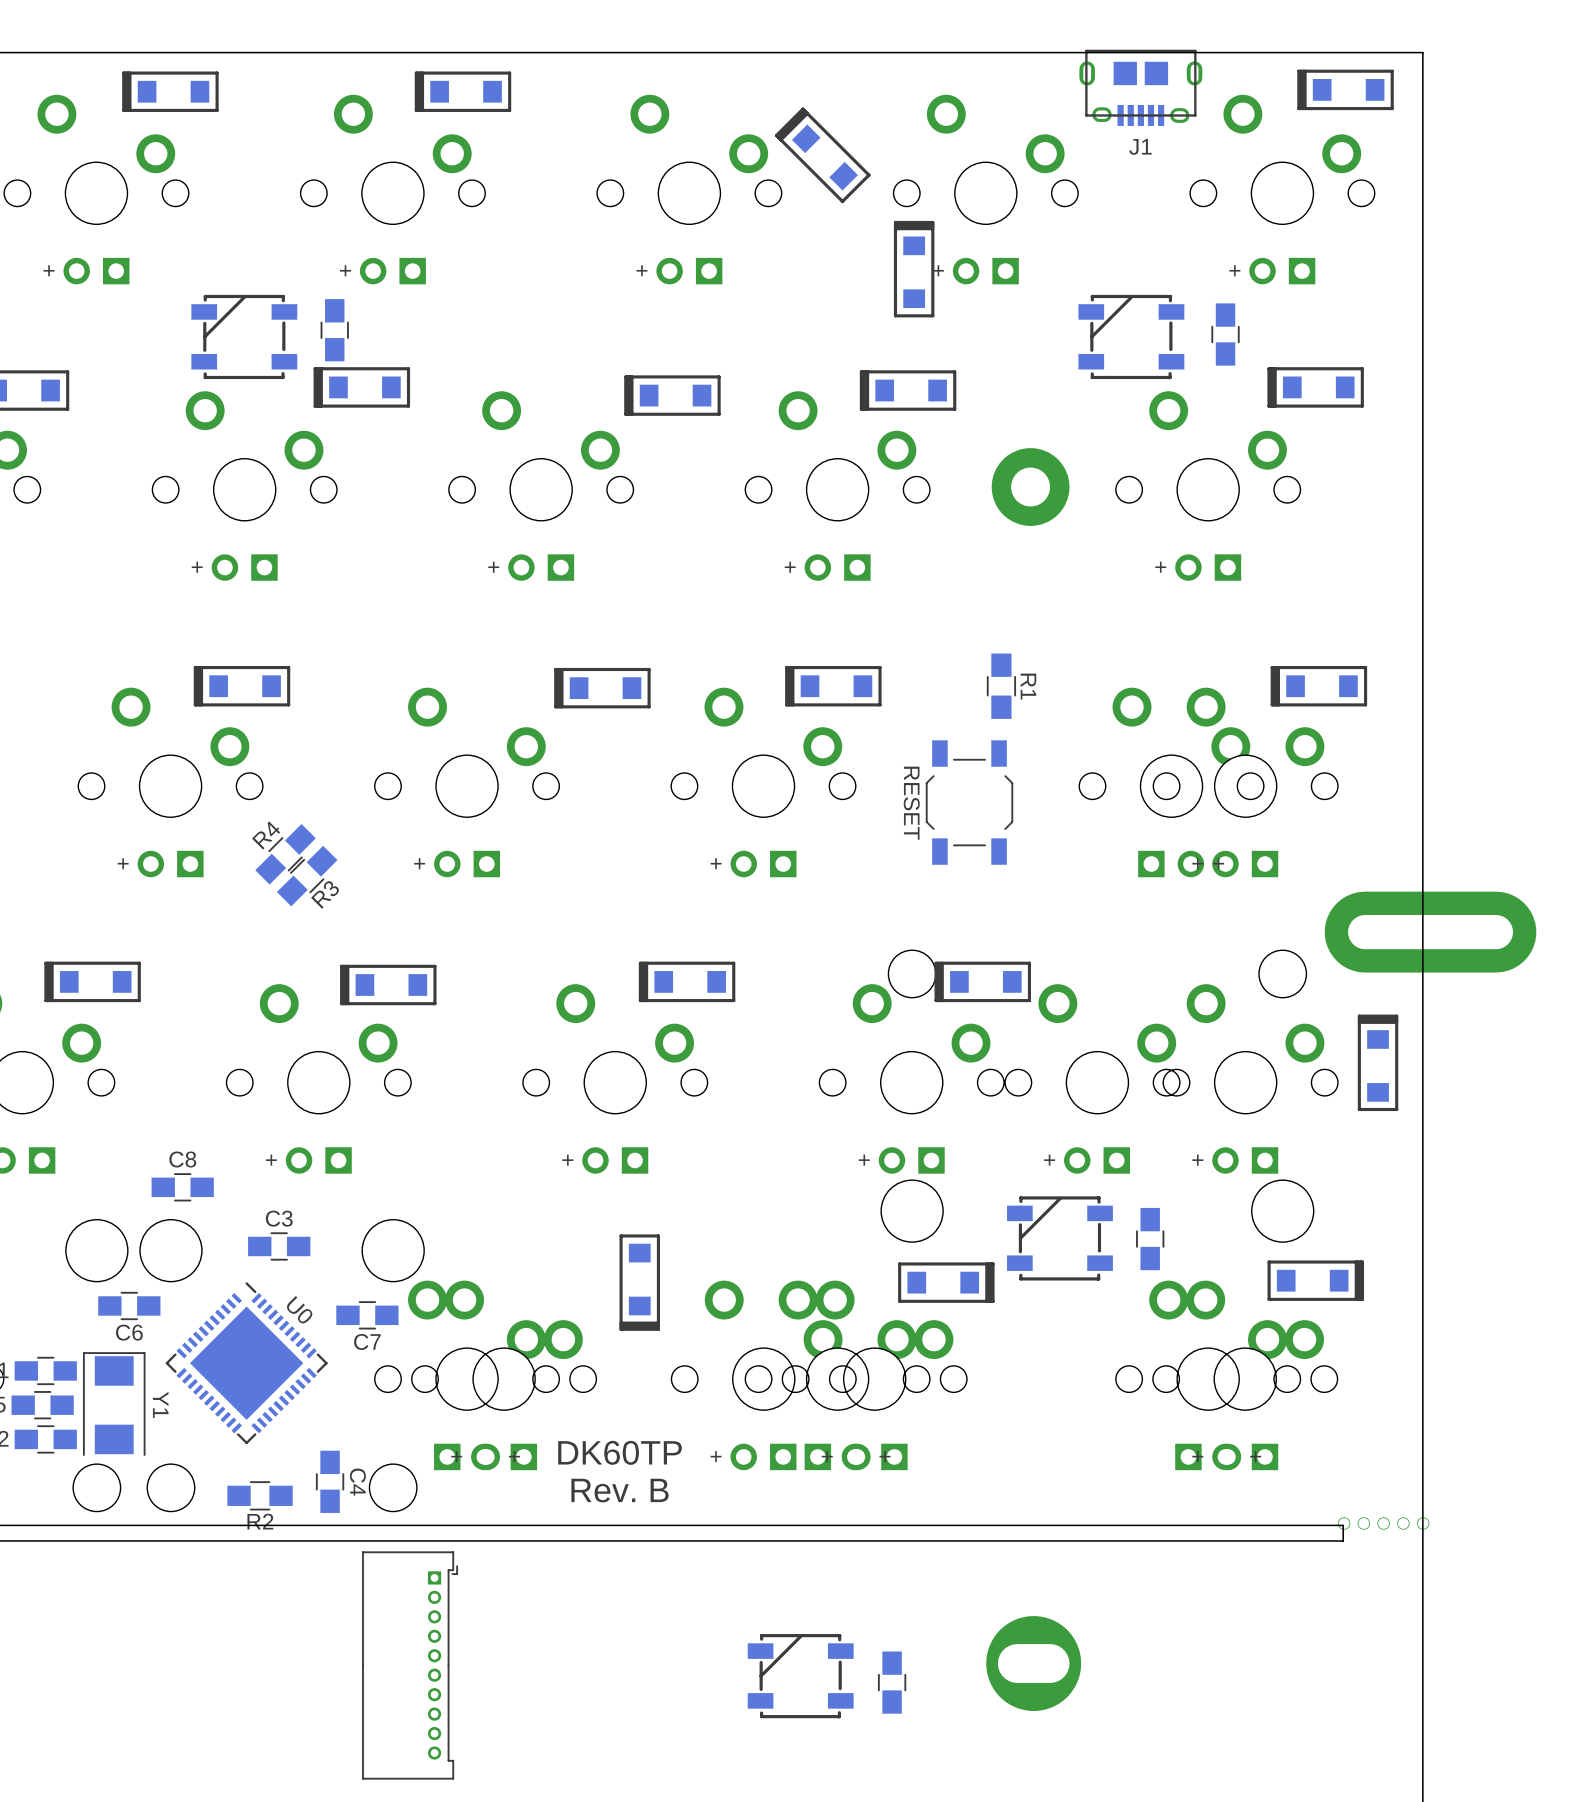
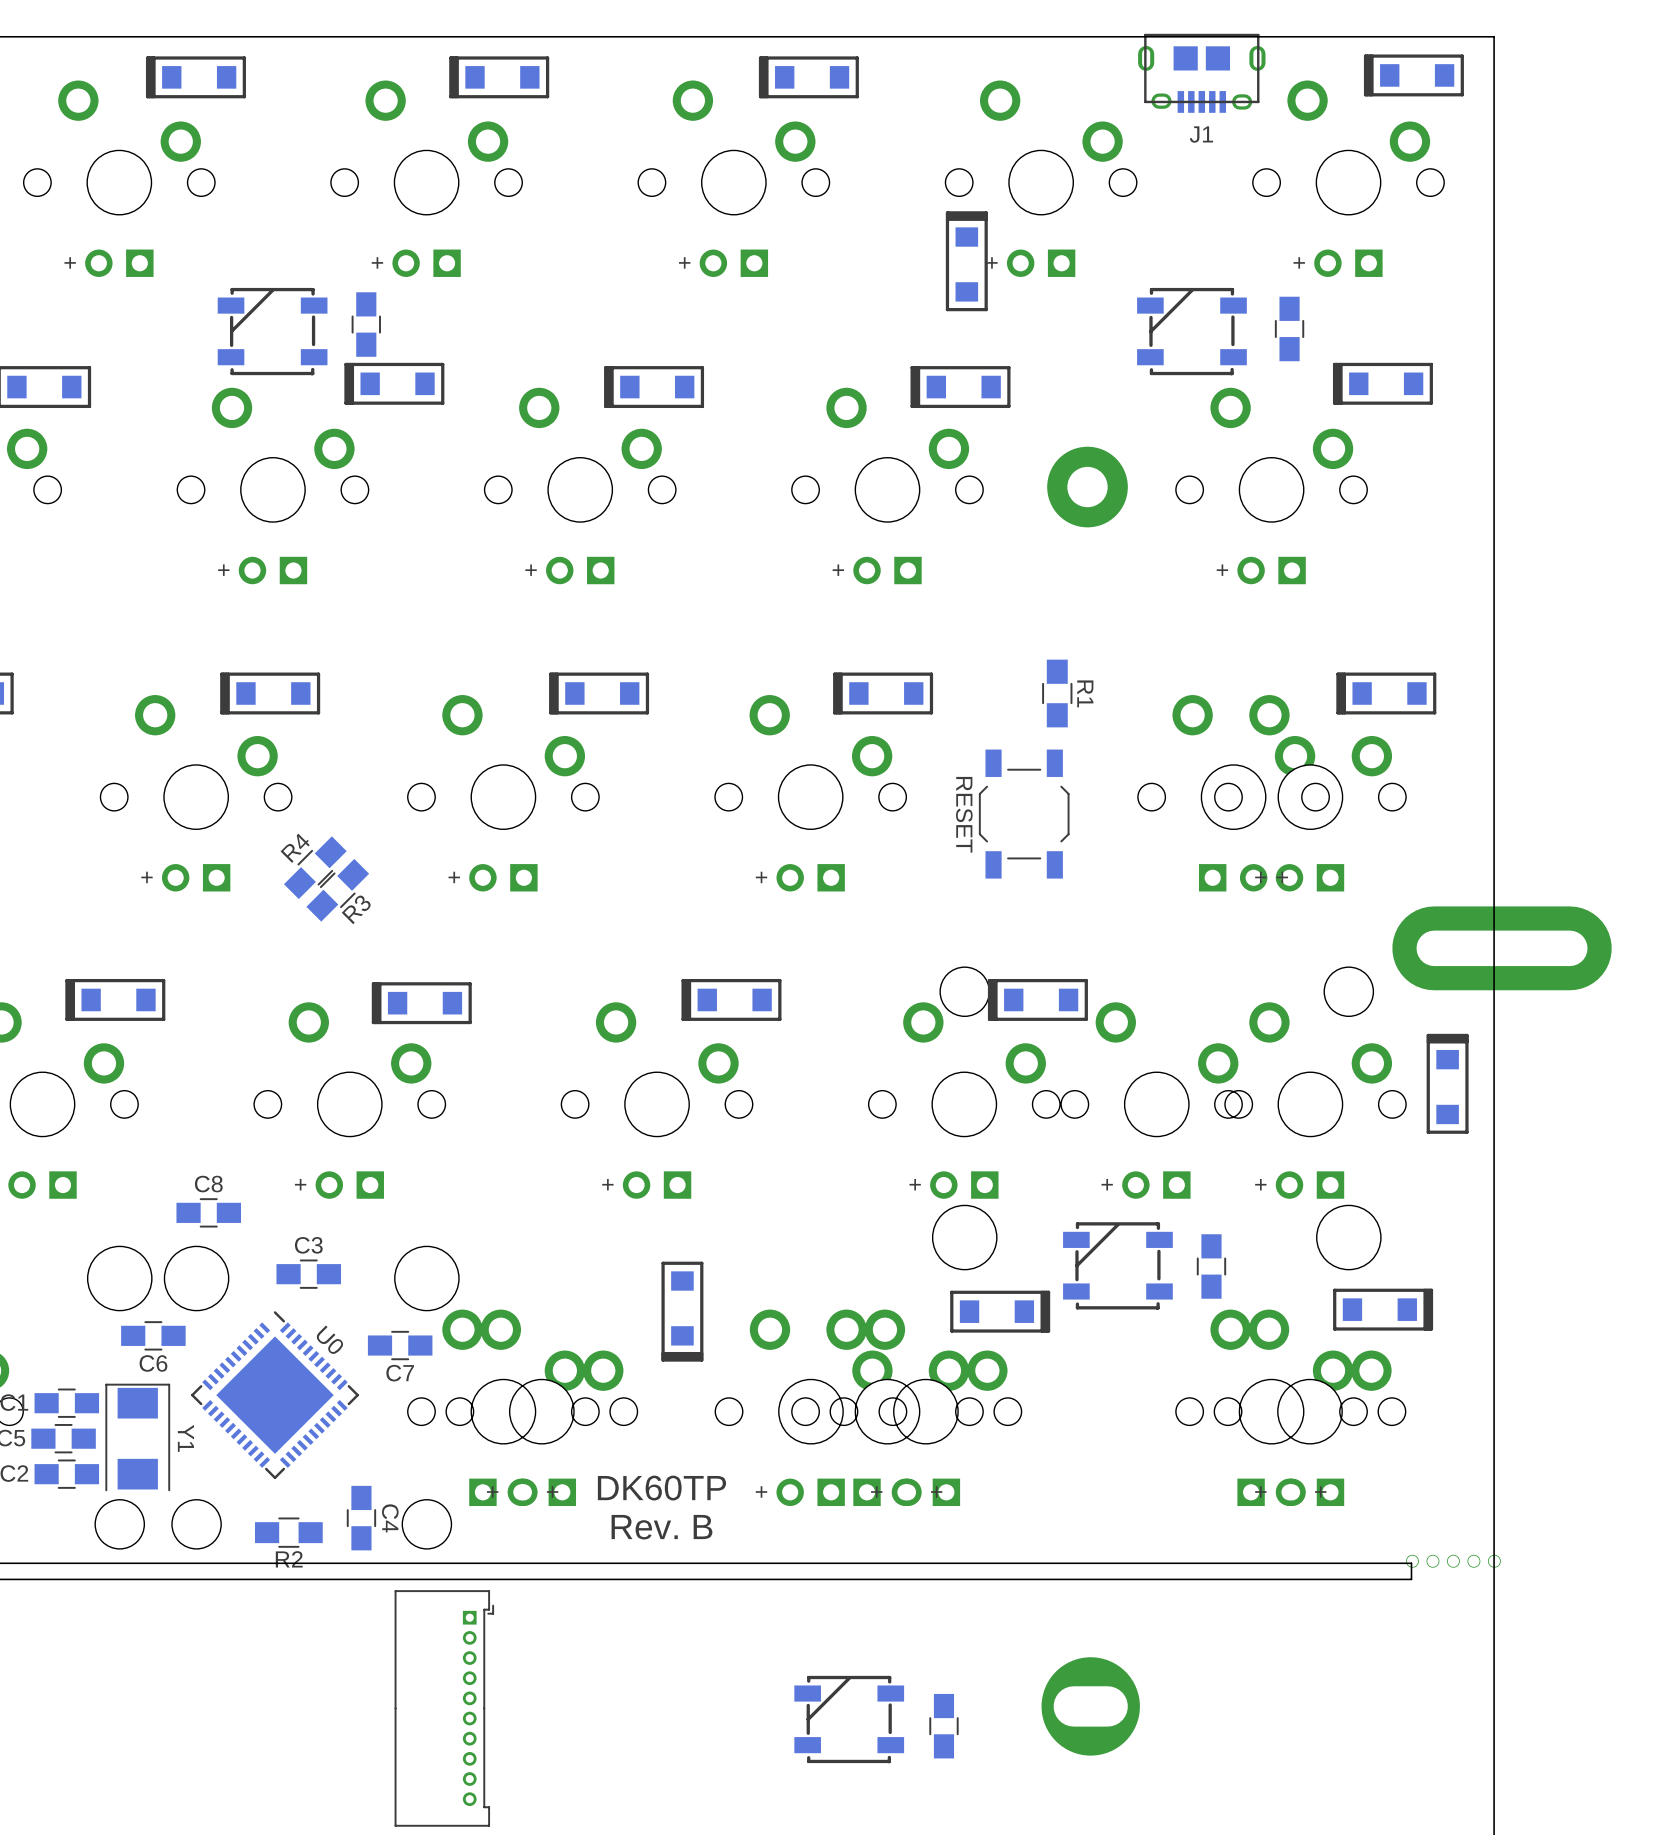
part: none -> (808, 77)
part: (822, 155) -> none
part position: (672, 395) -> (654, 387)
part position: (602, 688) -> (599, 693)

